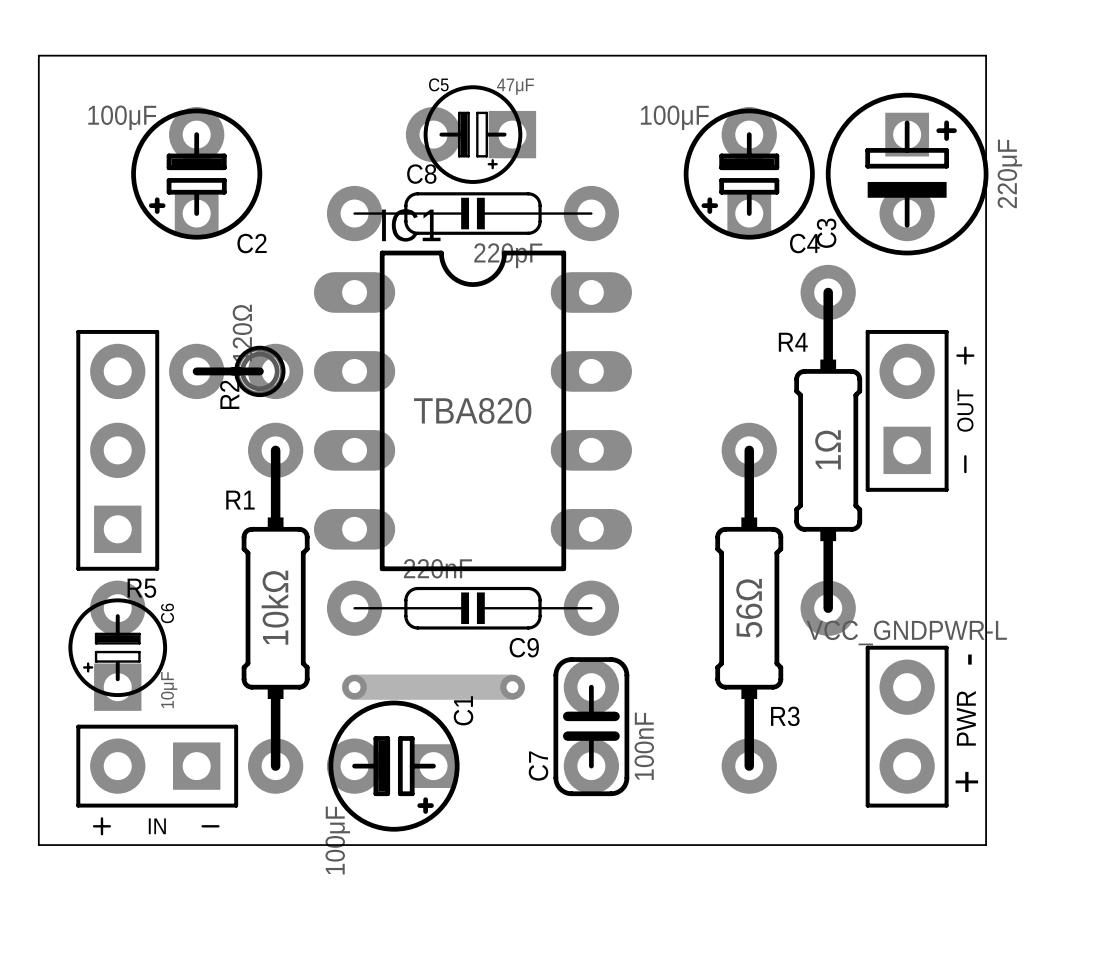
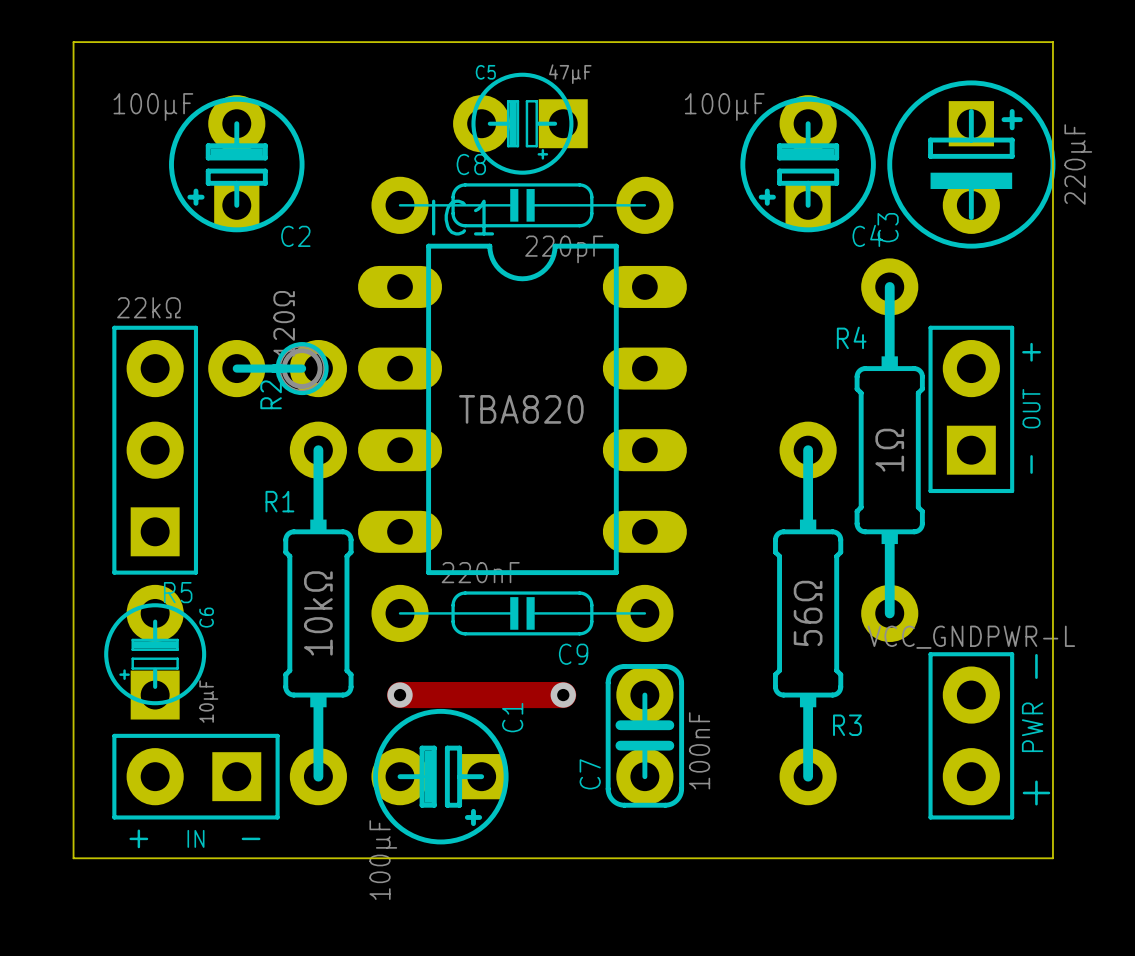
R5 value: none -> 22kΩ (148, 307)

